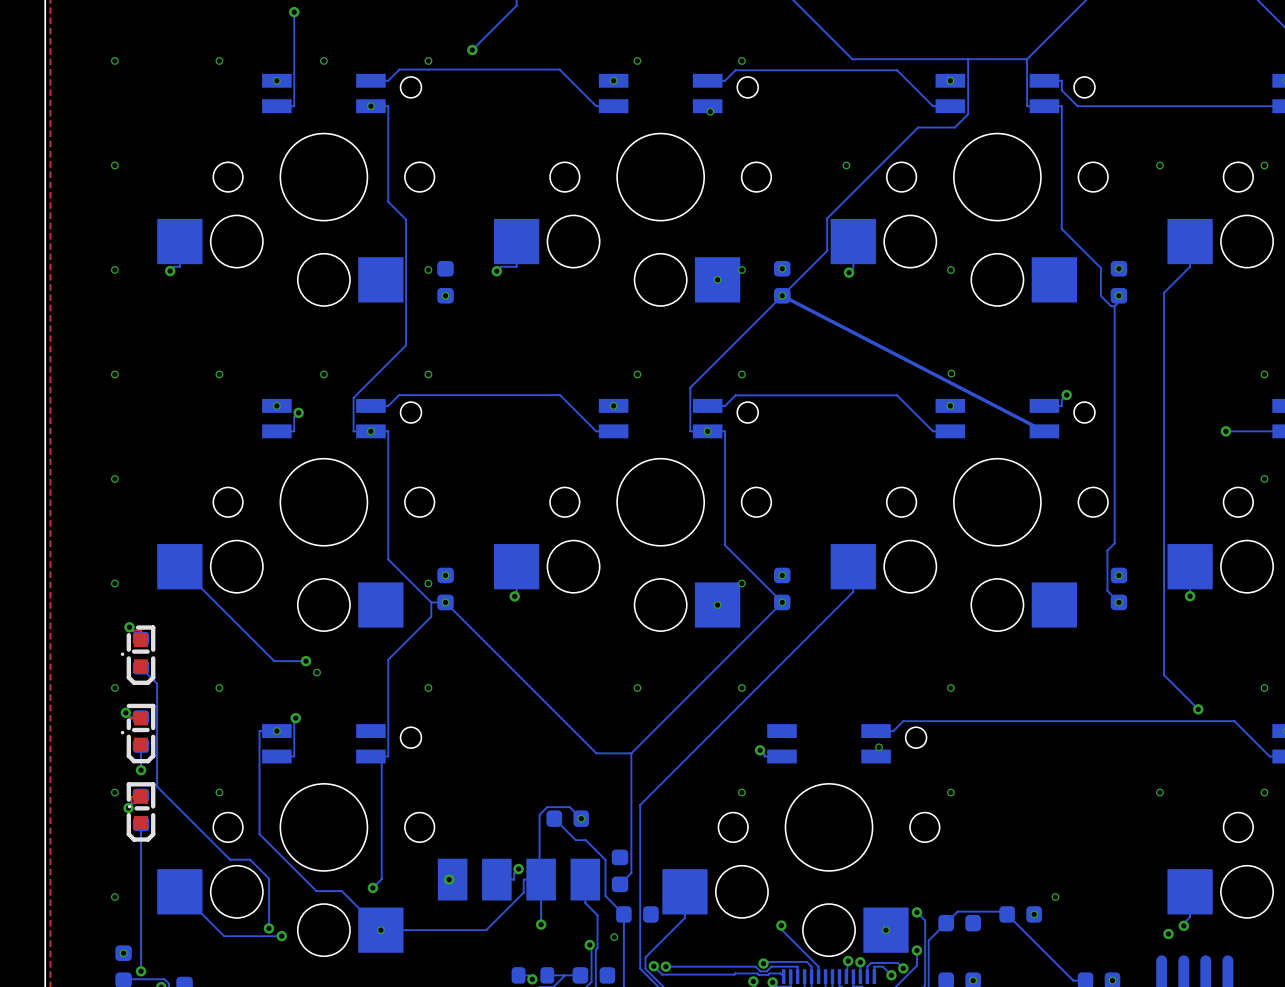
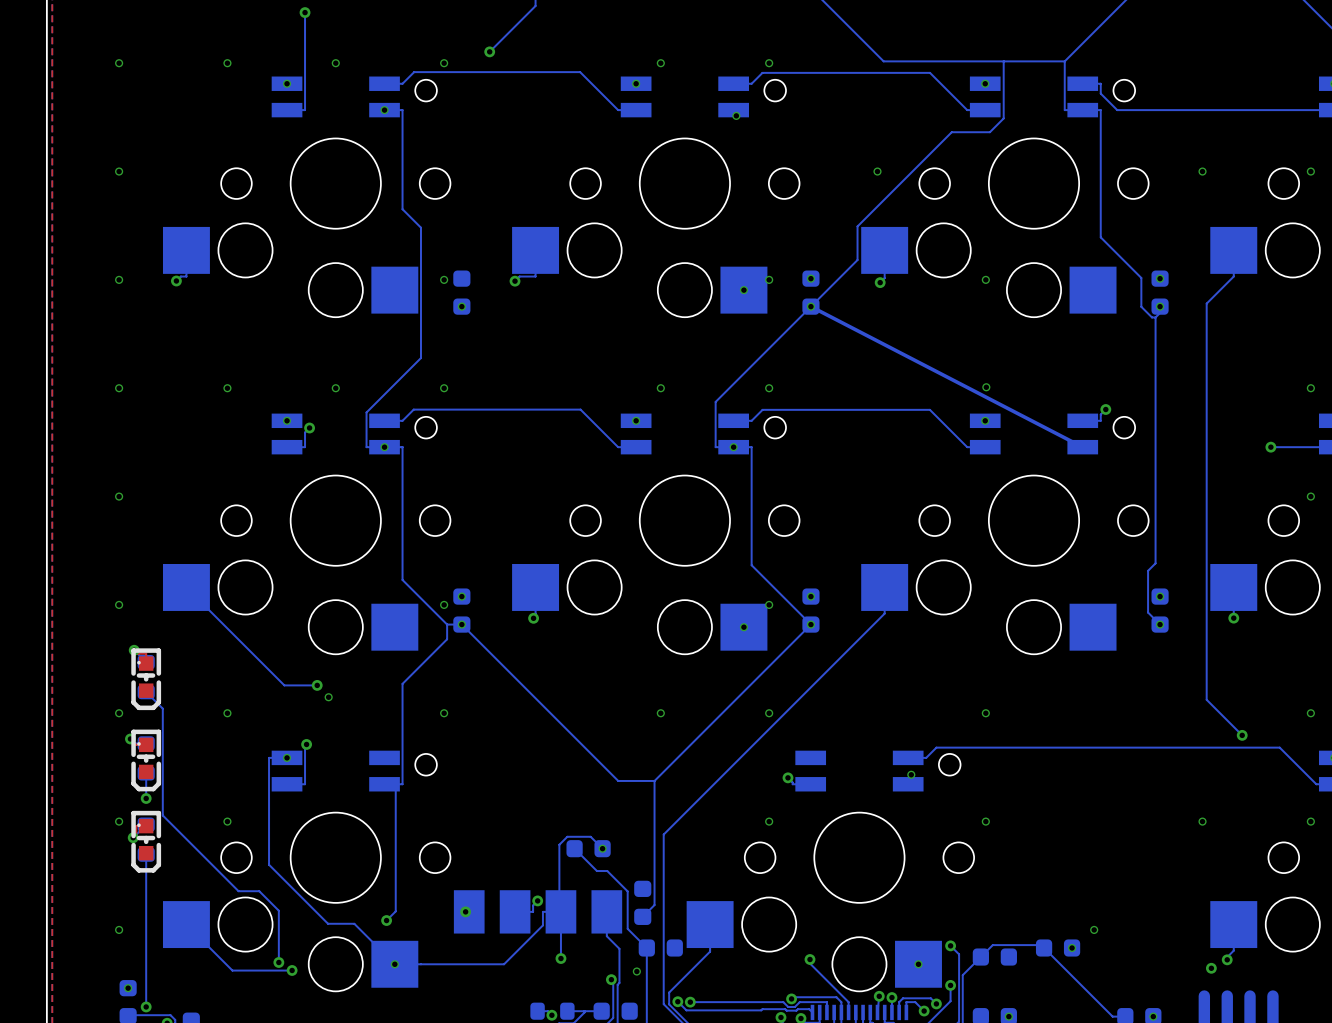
part footprint: [120, 625, 156, 685] -> [131, 648, 162, 711]
part footprint: [120, 703, 156, 764] -> [131, 729, 162, 792]
part footprint: [126, 782, 156, 842] -> [131, 810, 162, 873]

